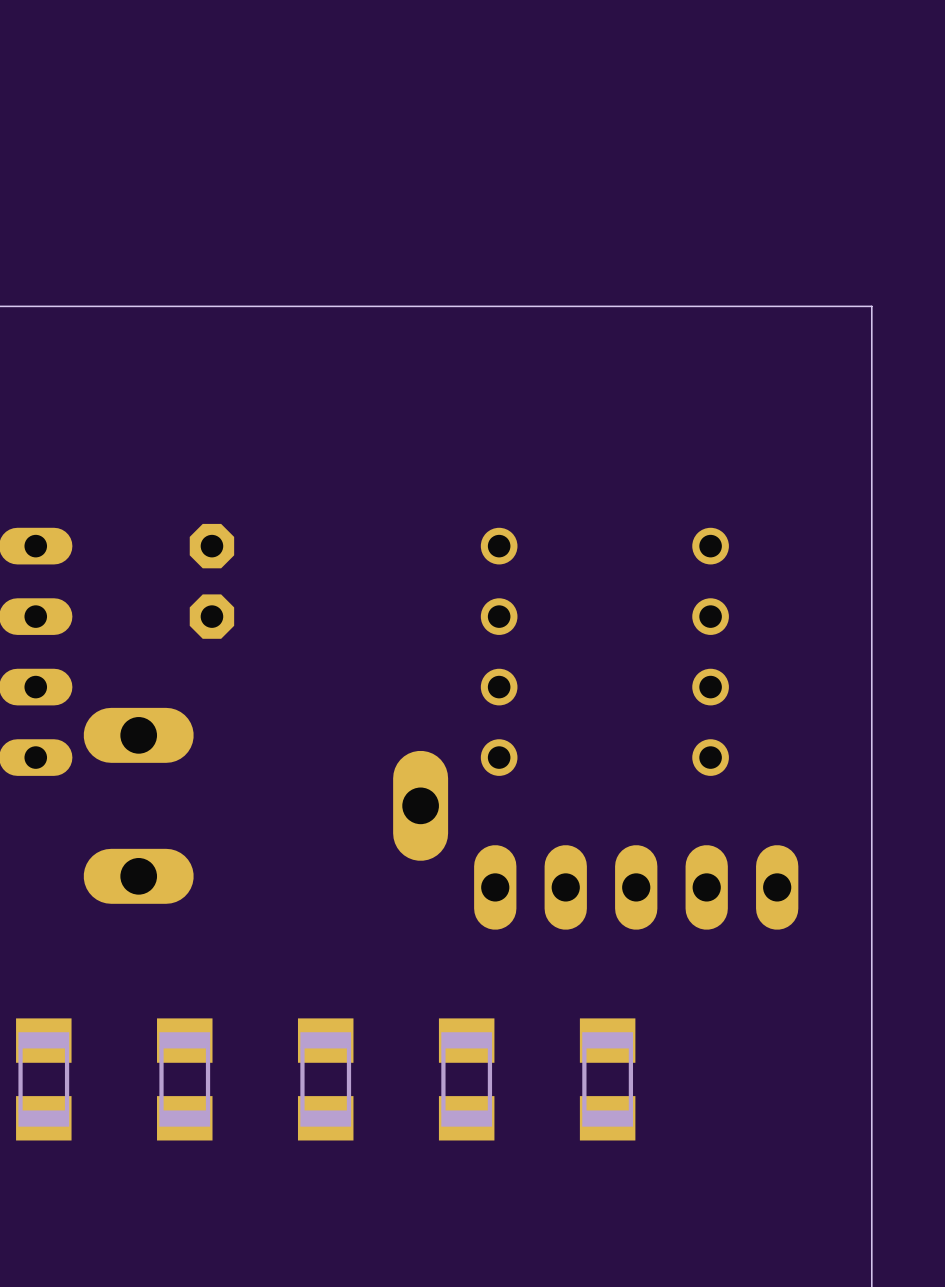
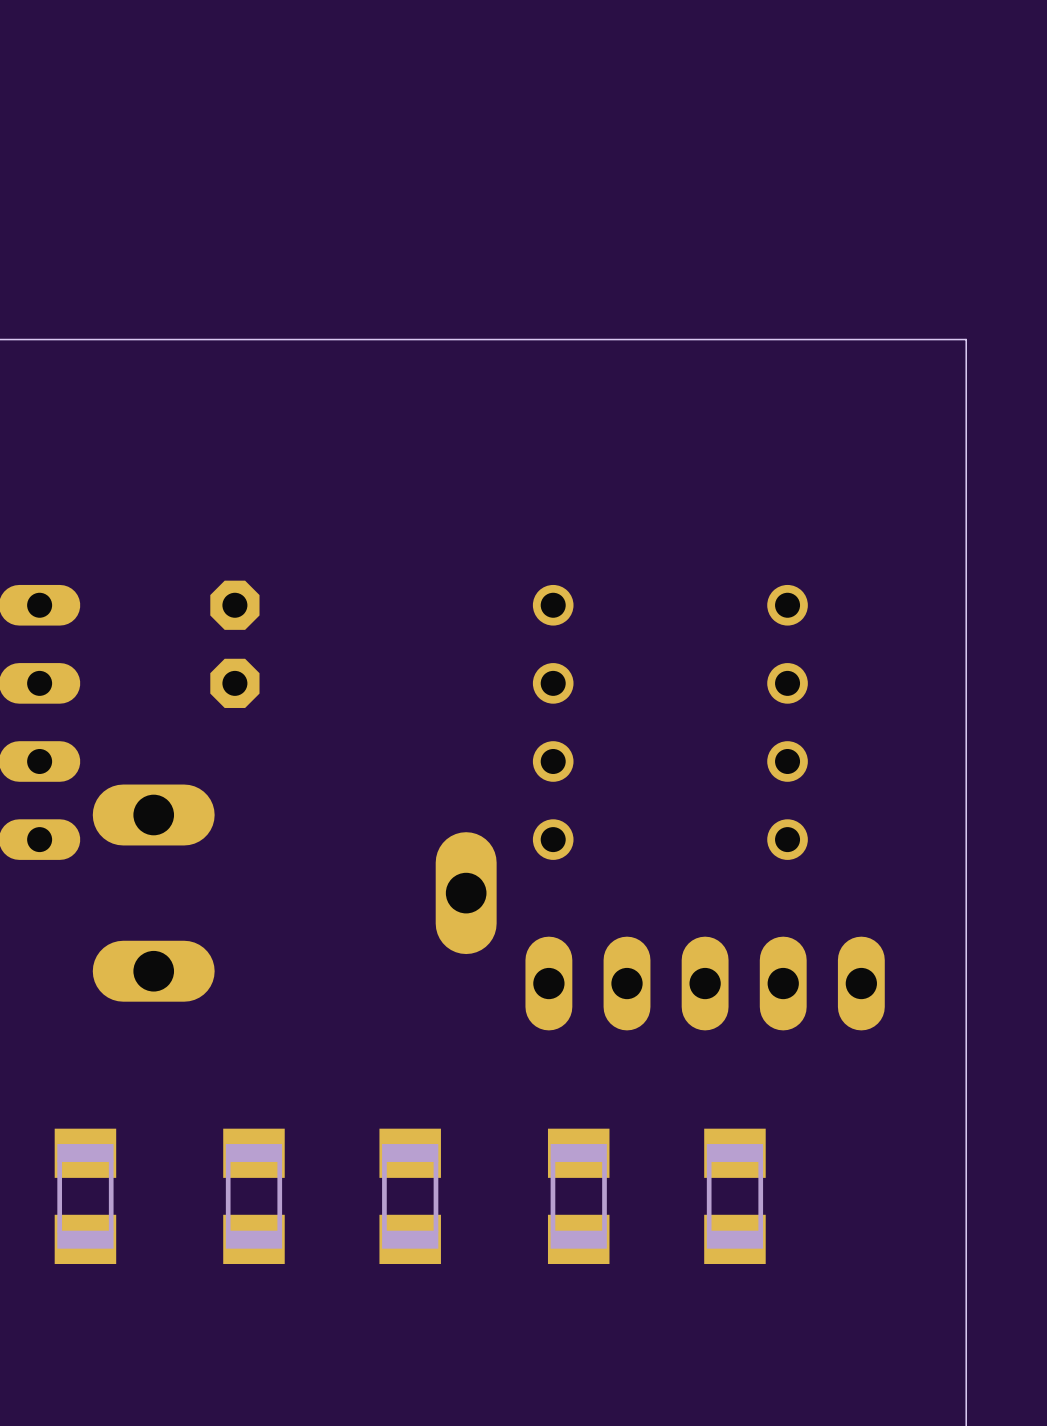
part position: (43, 1079) -> (85, 1196)
part position: (184, 1079) -> (253, 1196)
part position: (325, 1079) -> (410, 1196)
part: (466, 1079) -> none
part: none -> (578, 1196)
part: (607, 1079) -> none
part: none -> (734, 1196)

